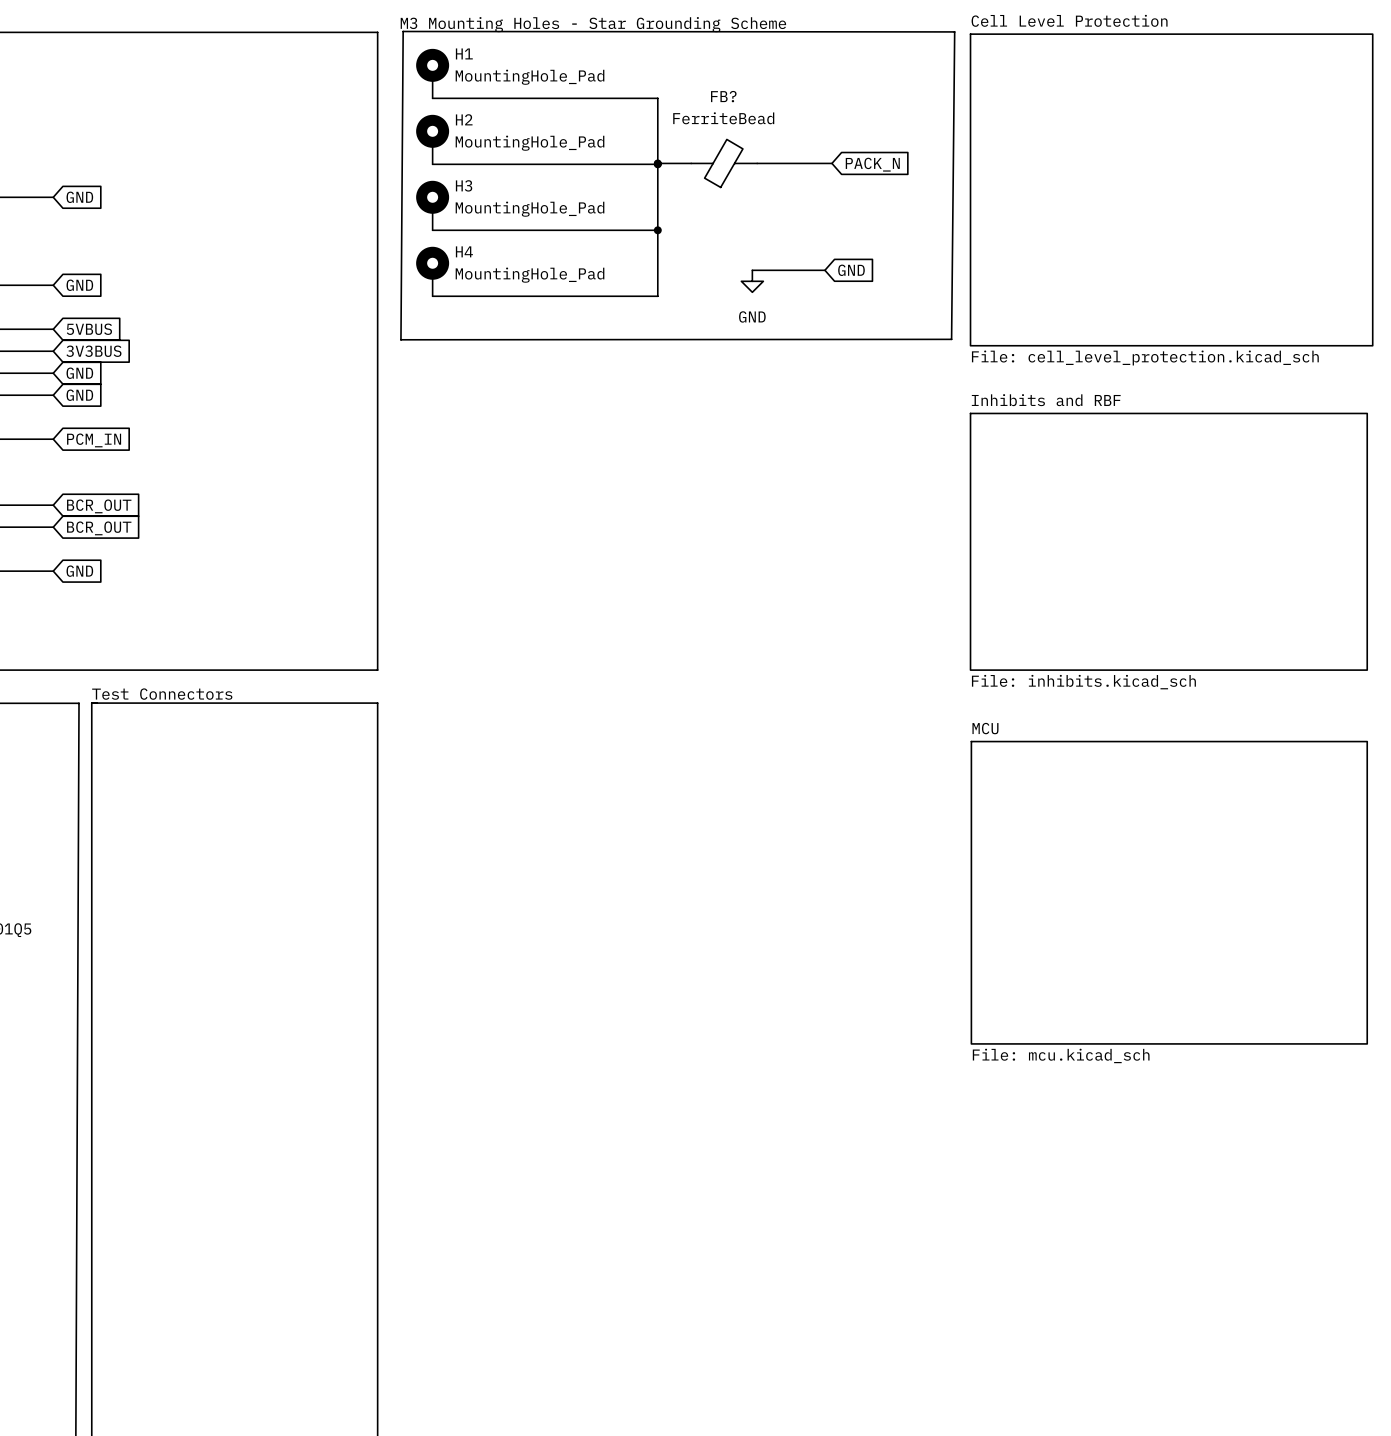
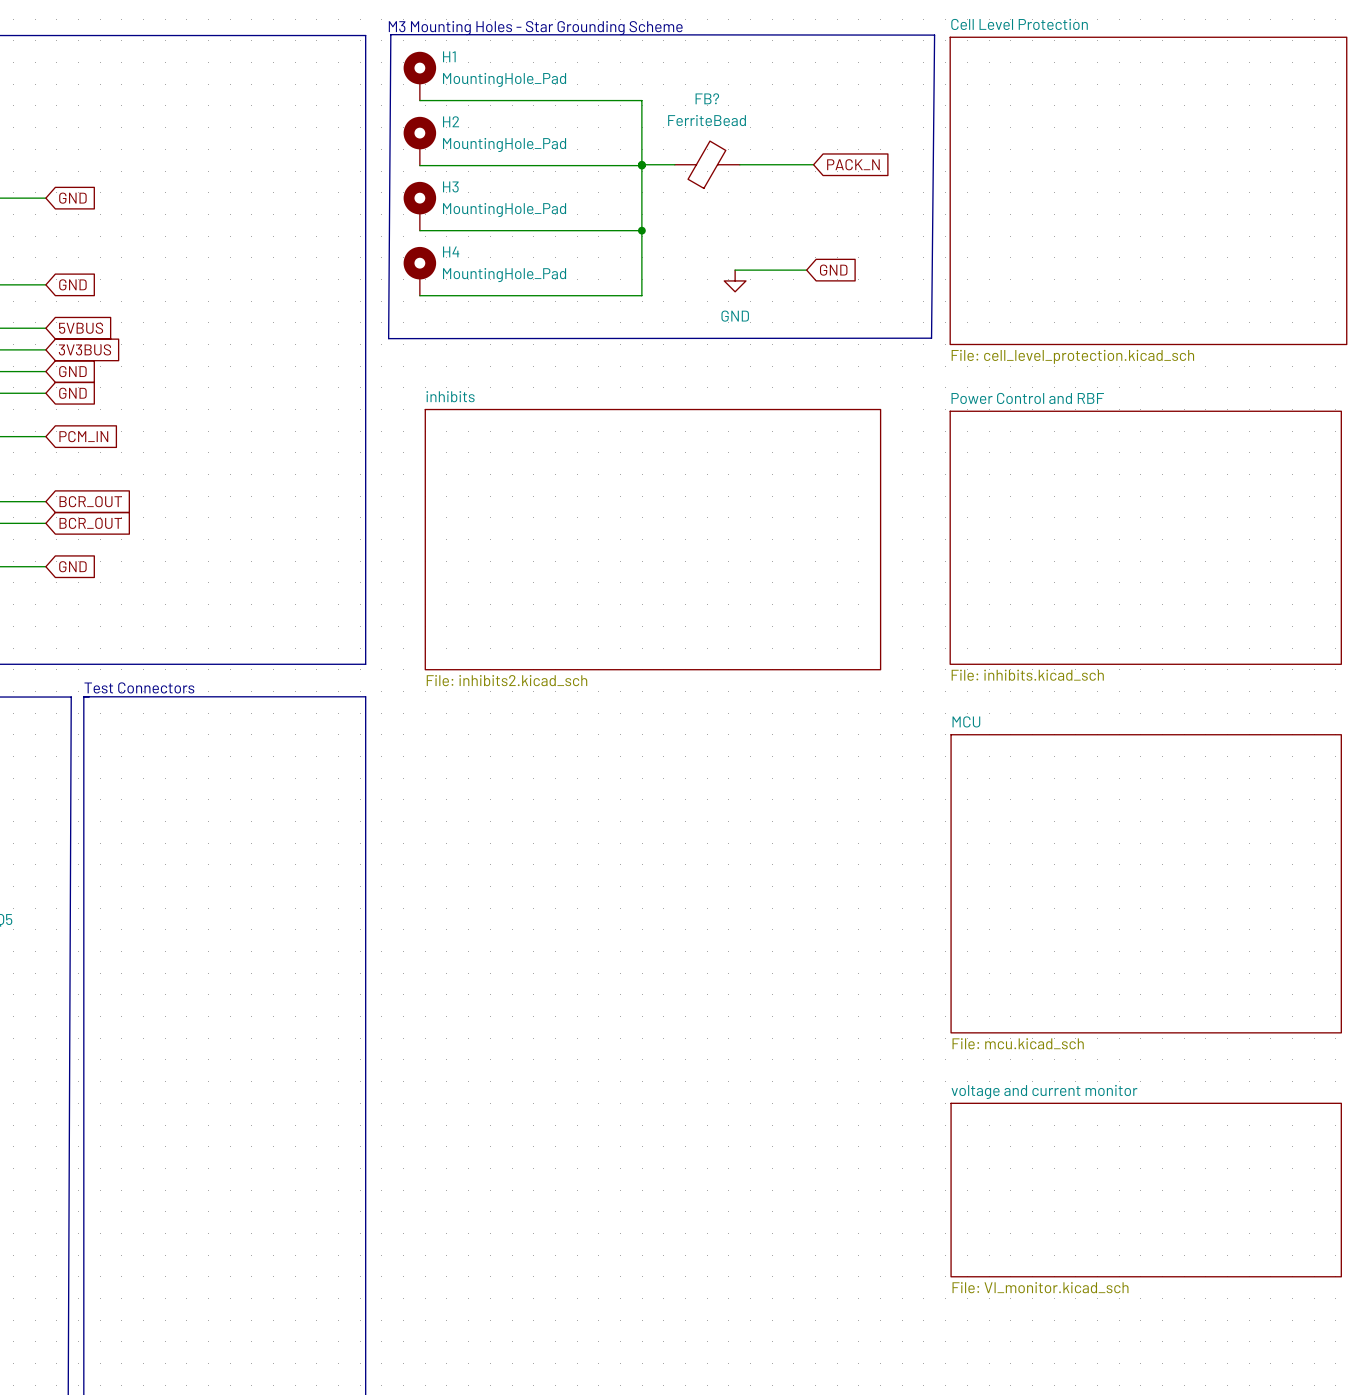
sheet Inhibits and RBF name: Inhibits and RBF (1046, 400) -> Power Control and RBF (1027, 398)
sheet inhibits: none -> File: inhibits2.kicad_sch (652, 539)
sheet voltage and current monitor: none -> File: VI_monitor.kicad_sch (1146, 1190)

